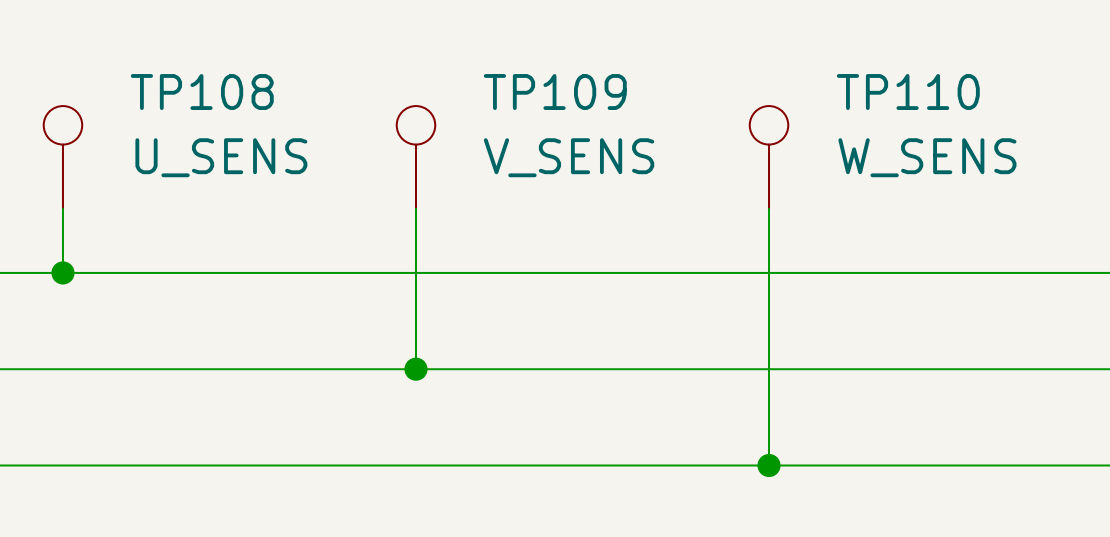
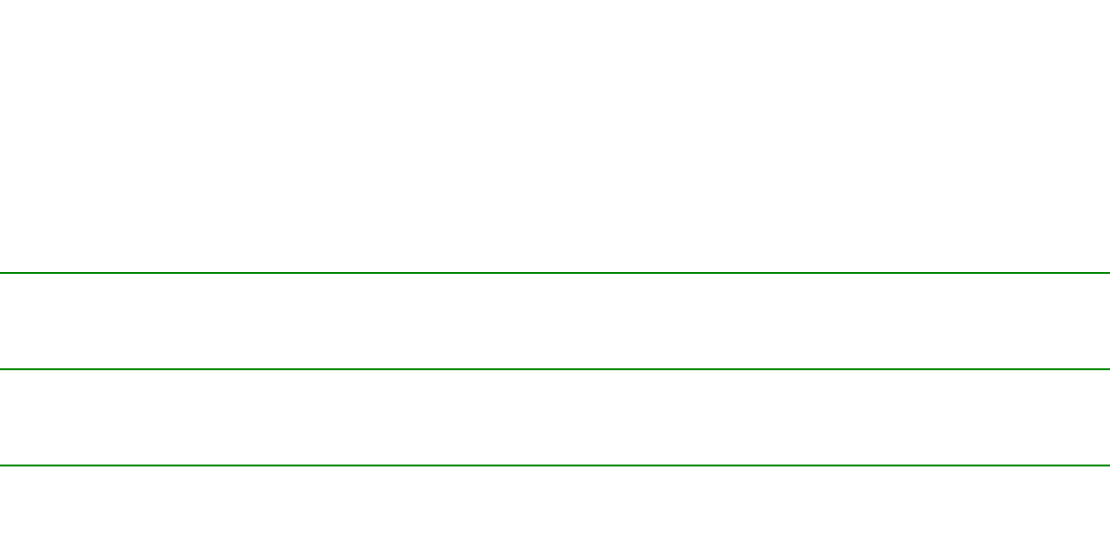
TP108: U_SENS (62, 157) -> none
TP109: V_SENS (415, 157) -> none
TP110: W_SENS (769, 157) -> none
wire: (62, 208) (62, 272) -> none
wire: (415, 208) (415, 369) -> none
wire: (769, 208) (769, 465) -> none
junction: (62, 272) -> none
junction: (415, 369) -> none
junction: (769, 465) -> none

